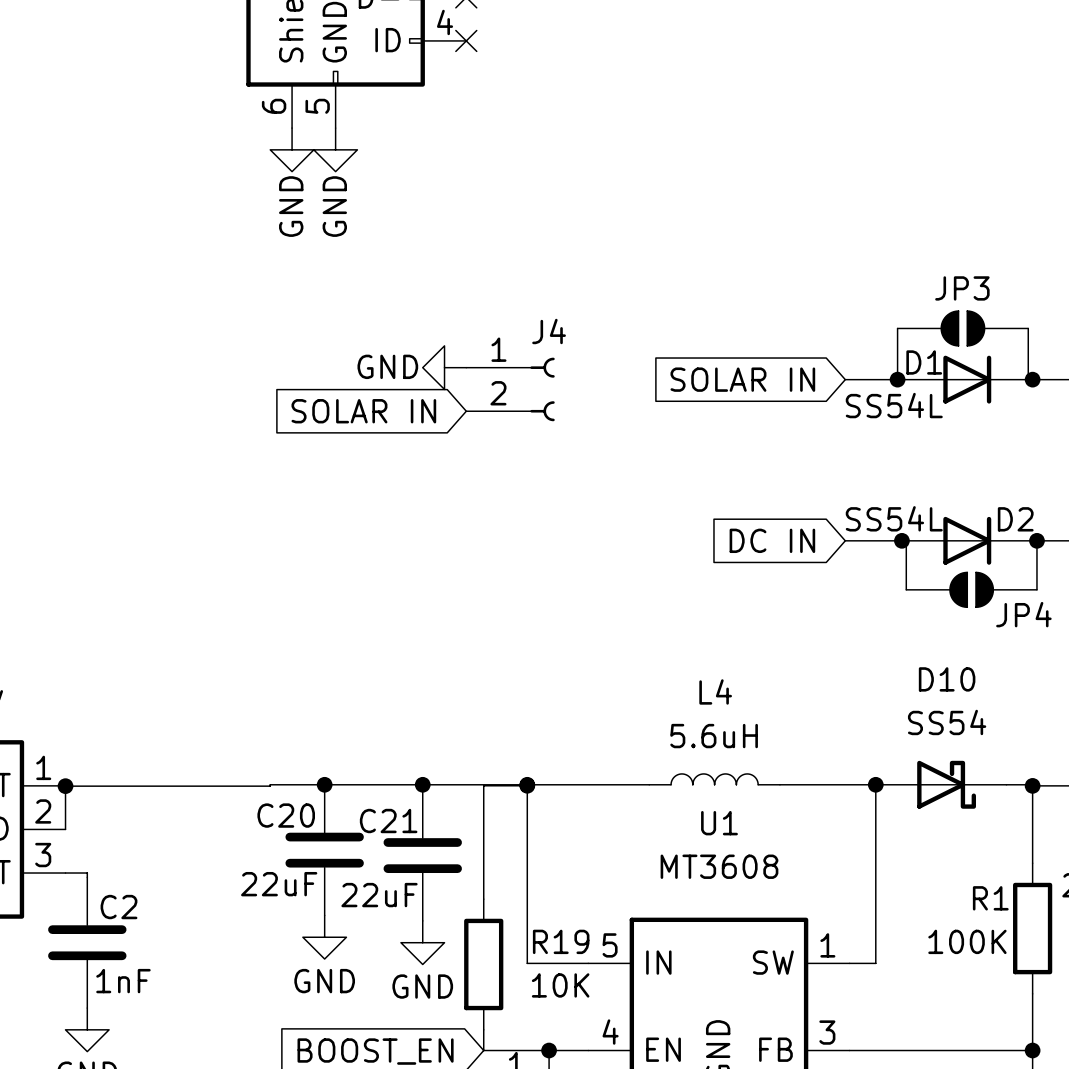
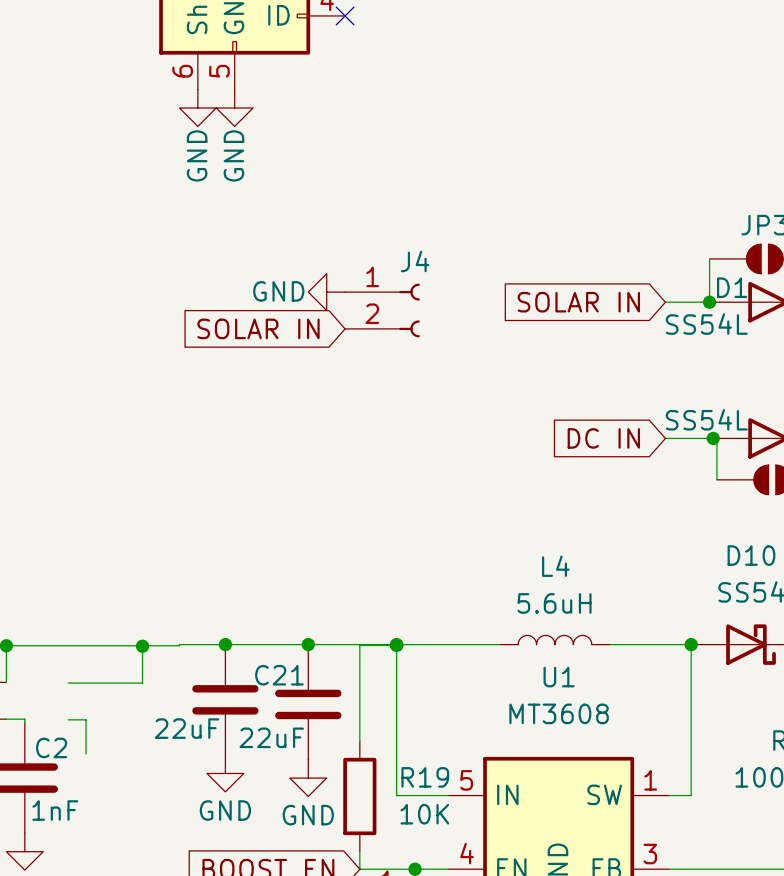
wire: none -> (142, 646) (142, 683) (68, 683)
junction: none -> (142, 646)
C20 name: C20 (286, 815) -> none
wire: none -> (68, 719) (86, 719) (86, 754)

